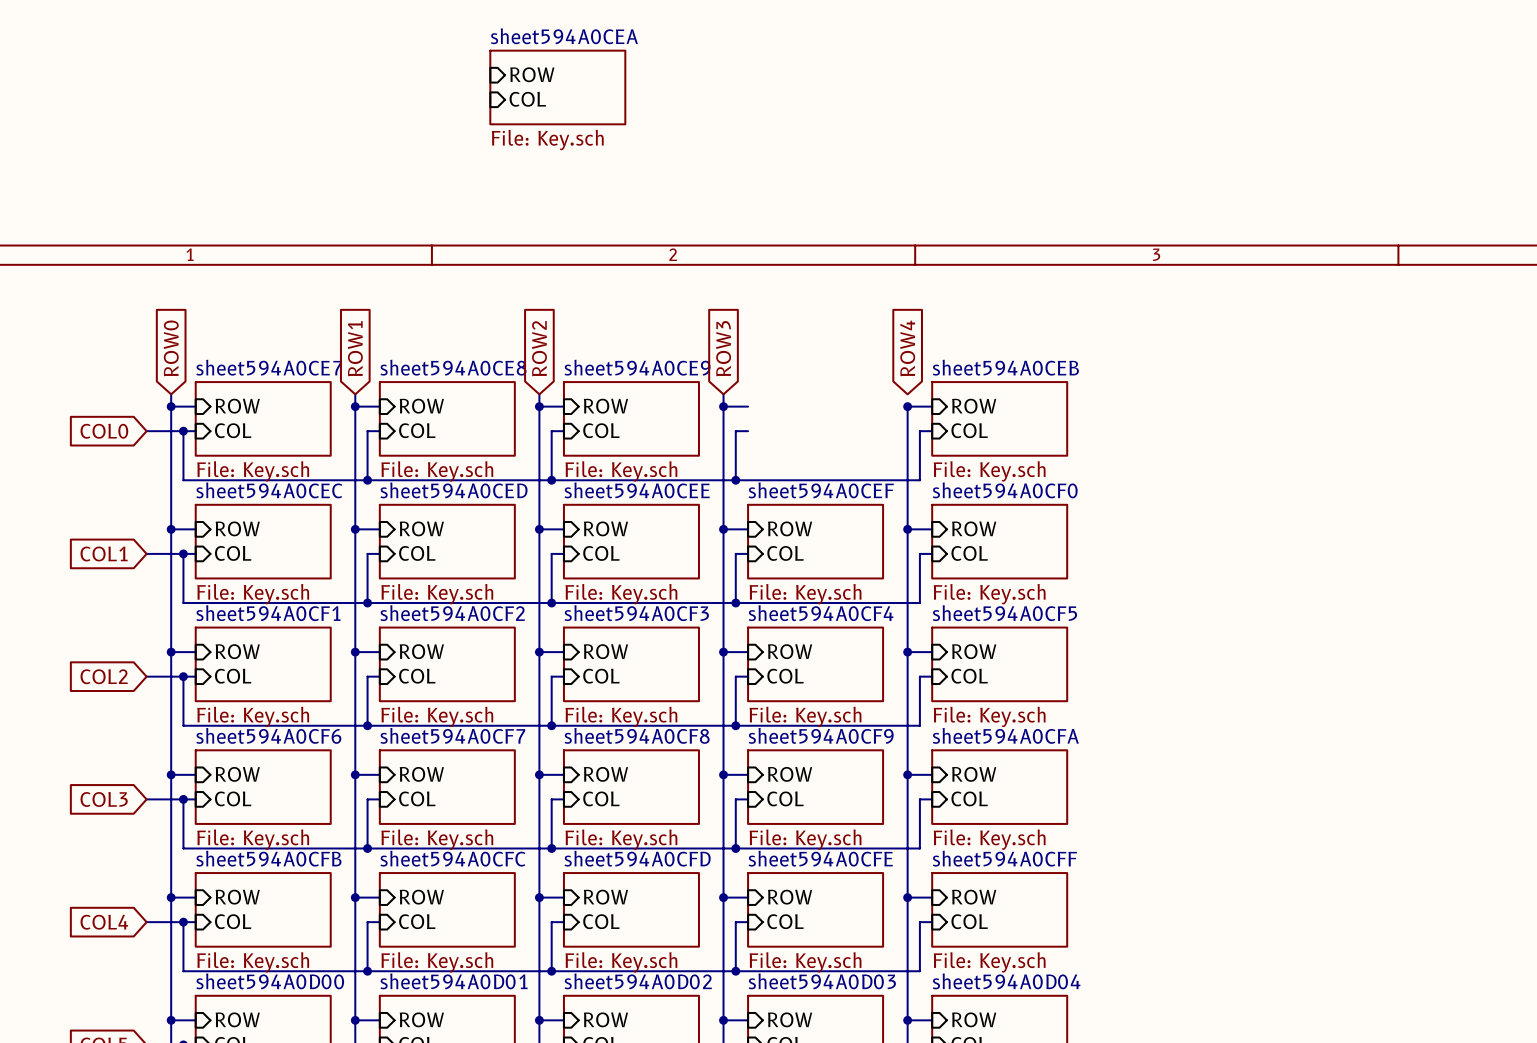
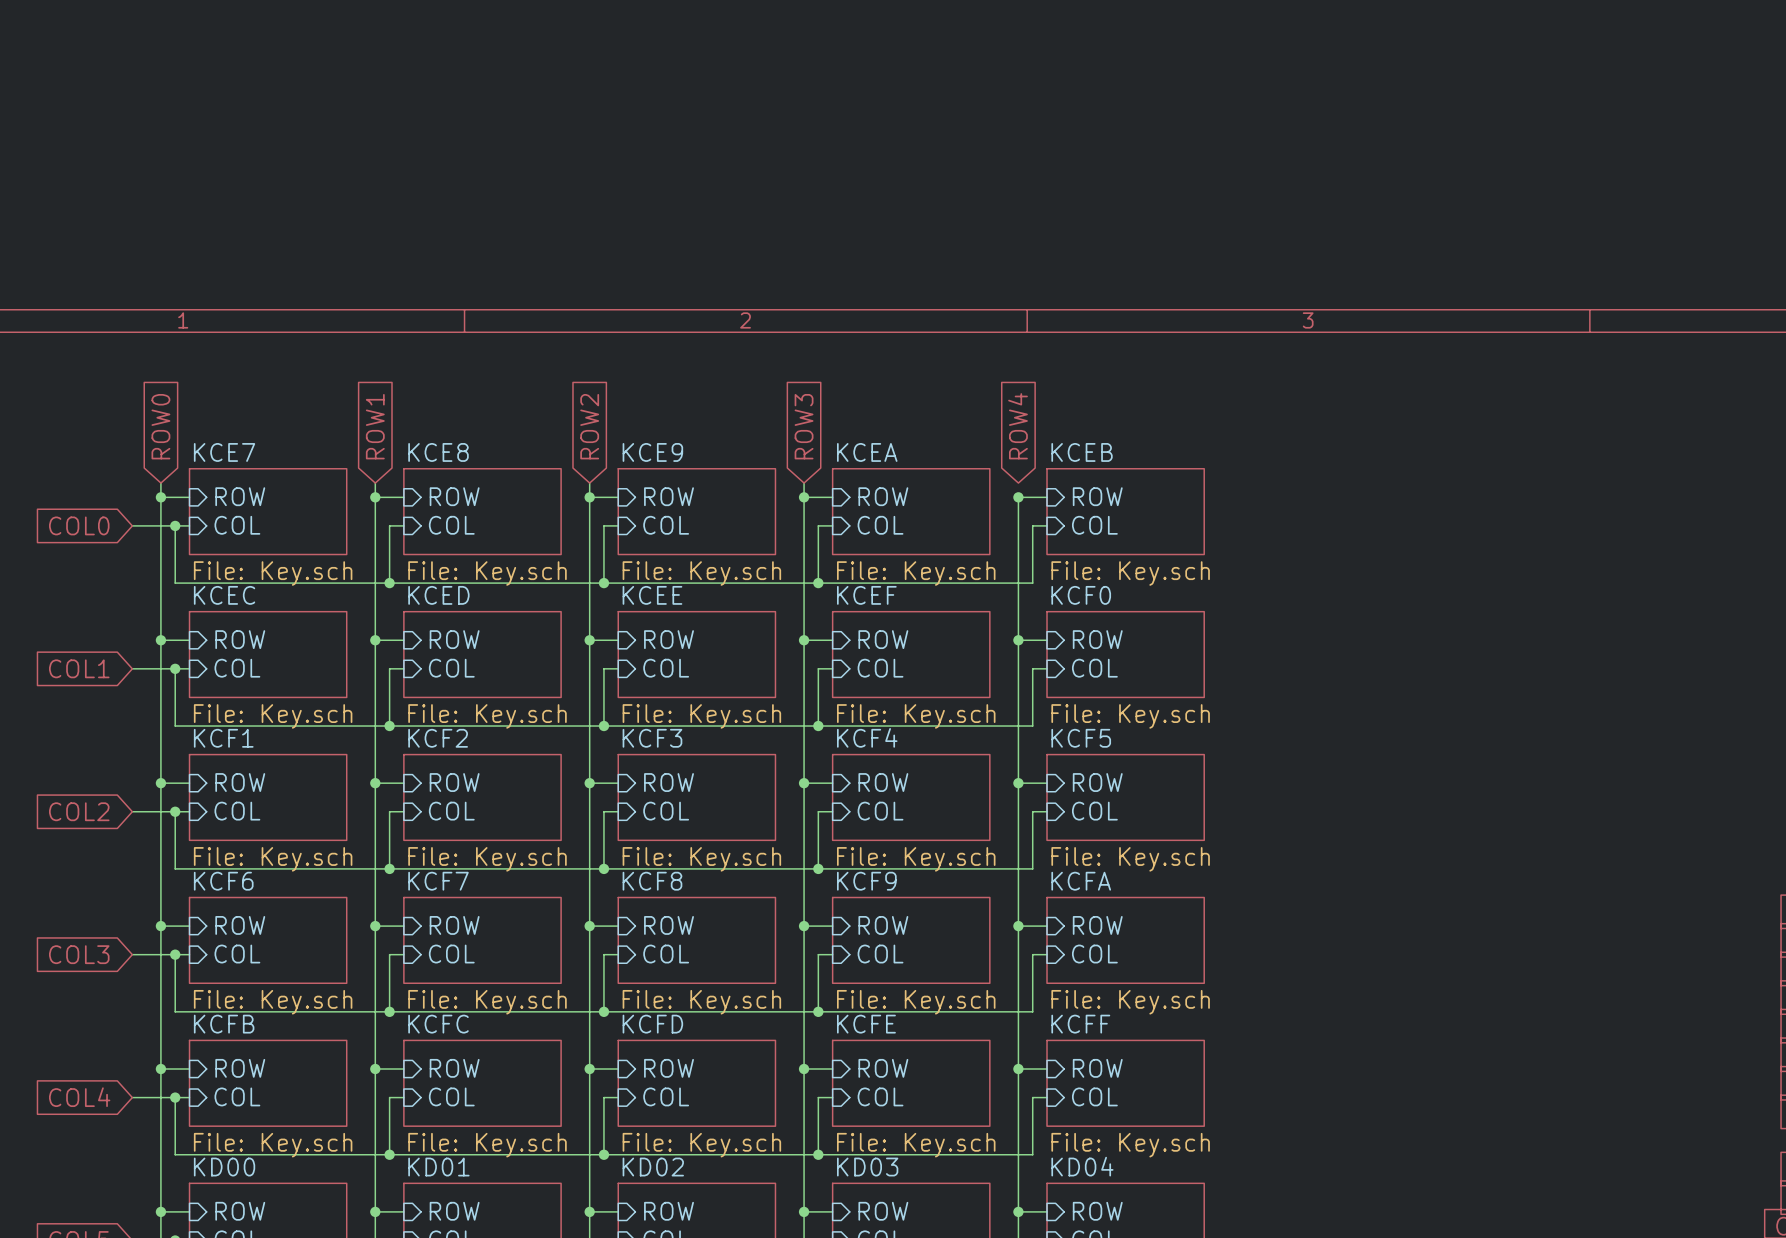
sheet pin: ROW (532, 74) -> none
sheet sheet594A0CEA: File: Key.sch (557, 87) -> none
sheet pin: COL (527, 99) -> none
sheet sheet594A0CE7 name: sheet594A0CE7 (269, 367) -> KCE7 (224, 452)
sheet sheet594A0CE8 name: sheet594A0CE8 (453, 367) -> KCE8 (438, 452)
sheet sheet594A0CE9 name: sheet594A0CE9 (637, 367) -> KCE9 (652, 452)
sheet sheet594A0CEB name: sheet594A0CEB (1005, 367) -> KCEB (1082, 452)
sheet pin: none -> ROW (883, 496)
sheet KCEA: none -> File: Key.sch (911, 511)
sheet pin: none -> COL (880, 525)
sheet sheet594A0CEC name: sheet594A0CEC (269, 490) -> KCEC (224, 595)
sheet sheet594A0CED name: sheet594A0CED (453, 490) -> KCED (438, 595)
sheet sheet594A0CEE name: sheet594A0CEE (637, 490) -> KCEE (652, 595)
sheet sheet594A0CEF name: sheet594A0CEF (821, 490) -> KCEF (866, 595)
sheet sheet594A0CF0 name: sheet594A0CF0 (1005, 490) -> KCF0 (1081, 595)
sheet sheet594A0CF1 name: sheet594A0CF1 (268, 613) -> KCF1 (223, 738)
sheet sheet594A0CF2 name: sheet594A0CF2 (452, 613) -> KCF2 (438, 738)
sheet sheet594A0CF3 name: sheet594A0CF3 (636, 613) -> KCF3 (652, 738)
sheet sheet594A0CF4 name: sheet594A0CF4 (821, 613) -> KCF4 (867, 737)
sheet sheet594A0CF5 name: sheet594A0CF5 (1004, 613) -> KCF5 (1081, 738)
sheet sheet594A0CF6 name: sheet594A0CF6 (268, 735) -> KCF6 (223, 881)
sheet sheet594A0CF7 name: sheet594A0CF7 (452, 735) -> KCF7 (438, 881)
sheet sheet594A0CF8 name: sheet594A0CF8 (637, 735) -> KCF8 (652, 881)
sheet sheet594A0CF9 name: sheet594A0CF9 (821, 735) -> KCF9 (866, 881)
sheet sheet594A0CFA name: sheet594A0CFA (1005, 735) -> KCFA (1081, 881)
sheet sheet594A0CFB name: sheet594A0CFB (268, 858) -> KCFB (224, 1024)
sheet sheet594A0CFC name: sheet594A0CFC (452, 858) -> KCFC (438, 1024)
sheet sheet594A0CFD name: sheet594A0CFD (637, 858) -> KCFD (652, 1024)
sheet sheet594A0CFE name: sheet594A0CFE (820, 858) -> KCFE (866, 1024)
sheet sheet594A0CFF name: sheet594A0CFF (1004, 858) -> KCFF (1080, 1024)
sheet sheet594A0D00 name: sheet594A0D00 (270, 981) -> KD00 (224, 1167)
sheet sheet594A0D01 name: sheet594A0D01 (454, 981) -> KD01 (438, 1167)
sheet sheet594A0D02 name: sheet594A0D02 (638, 981) -> KD02 (653, 1167)
sheet sheet594A0D03 name: sheet594A0D03 (822, 981) -> KD03 (867, 1167)
sheet sheet594A0D04 name: sheet594A0D04 (1006, 981) -> KD04 (1082, 1166)

